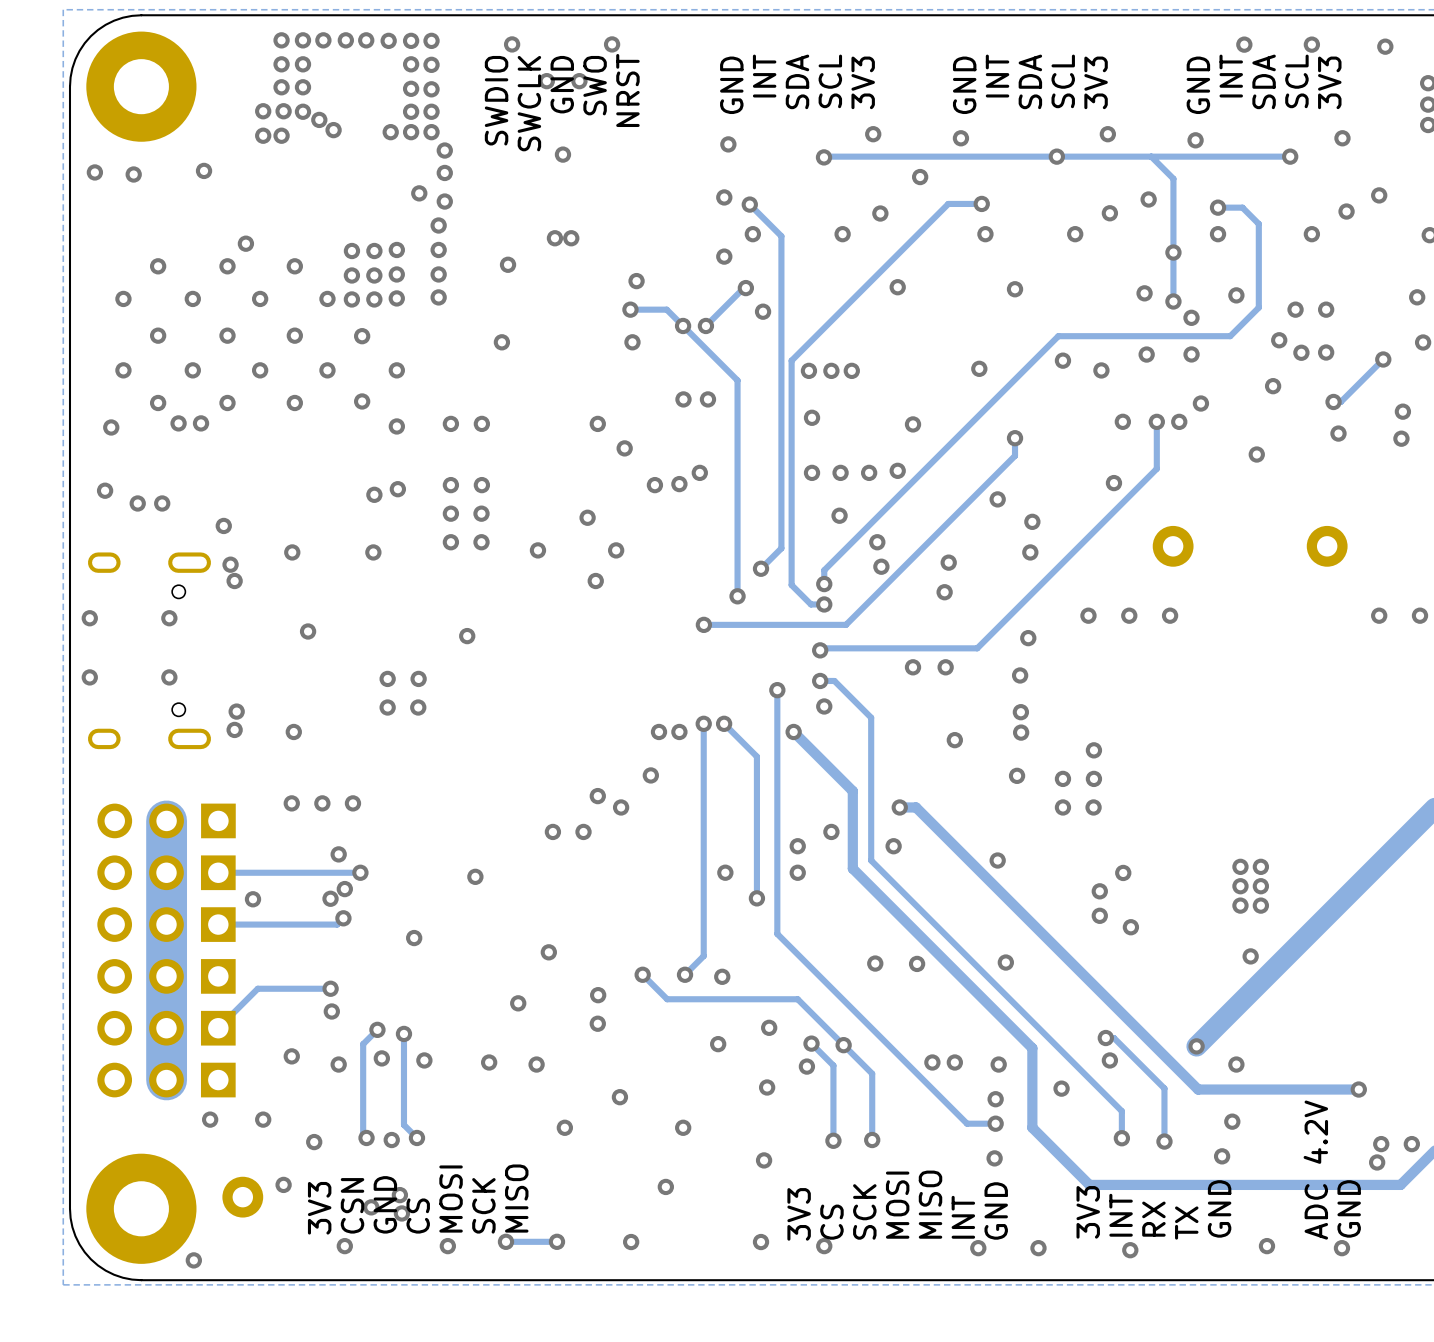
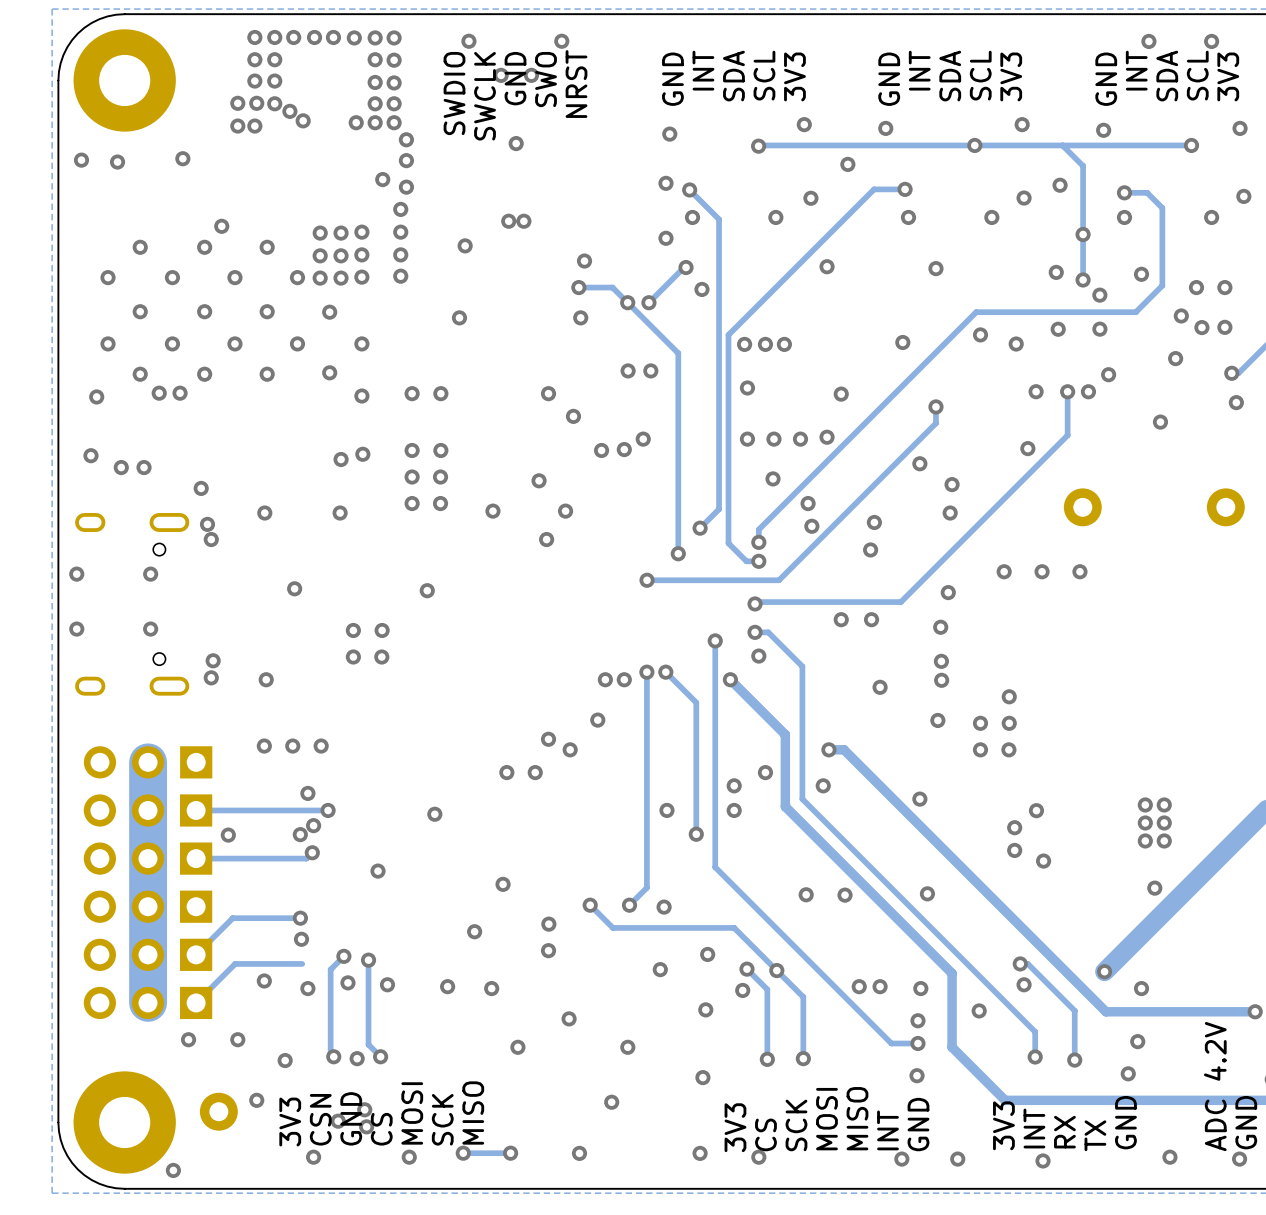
via position: (308, 631) -> (294, 588)
track: none -> (302, 963) (235, 963) (196, 1002)

